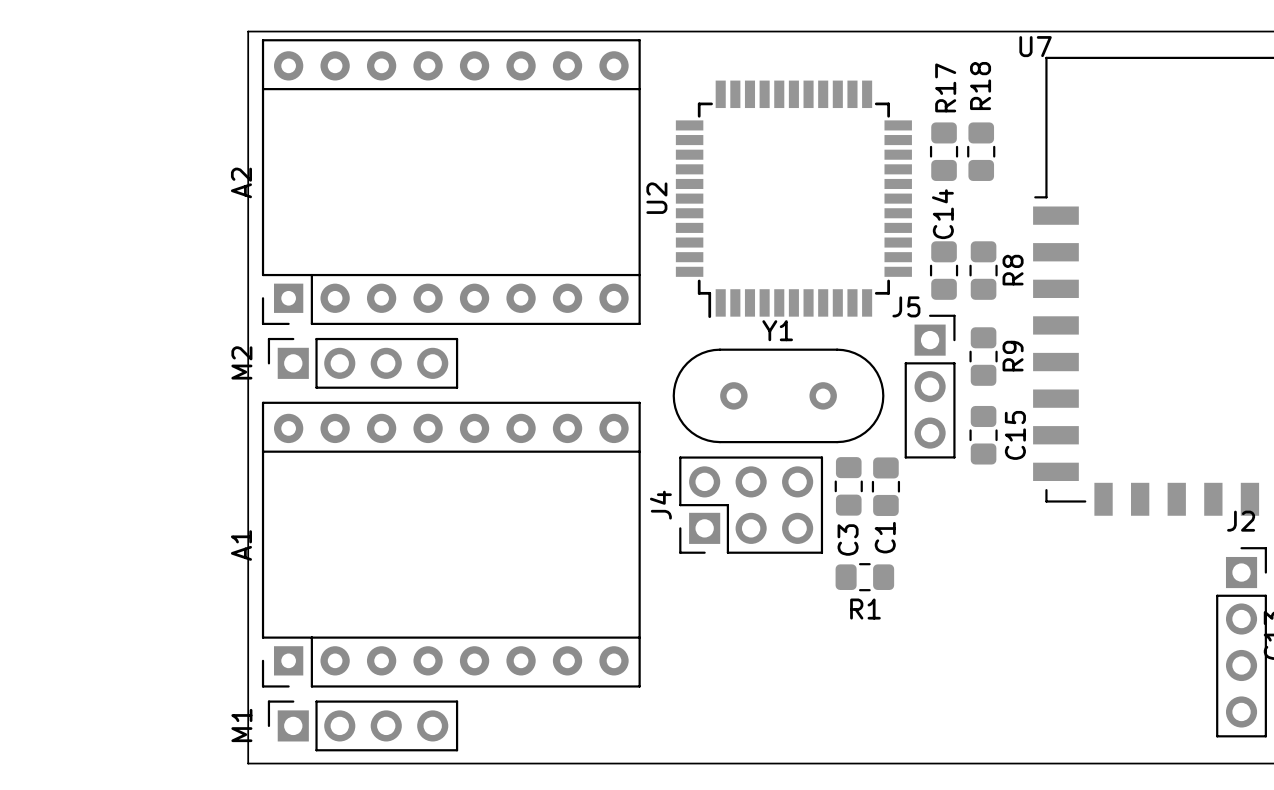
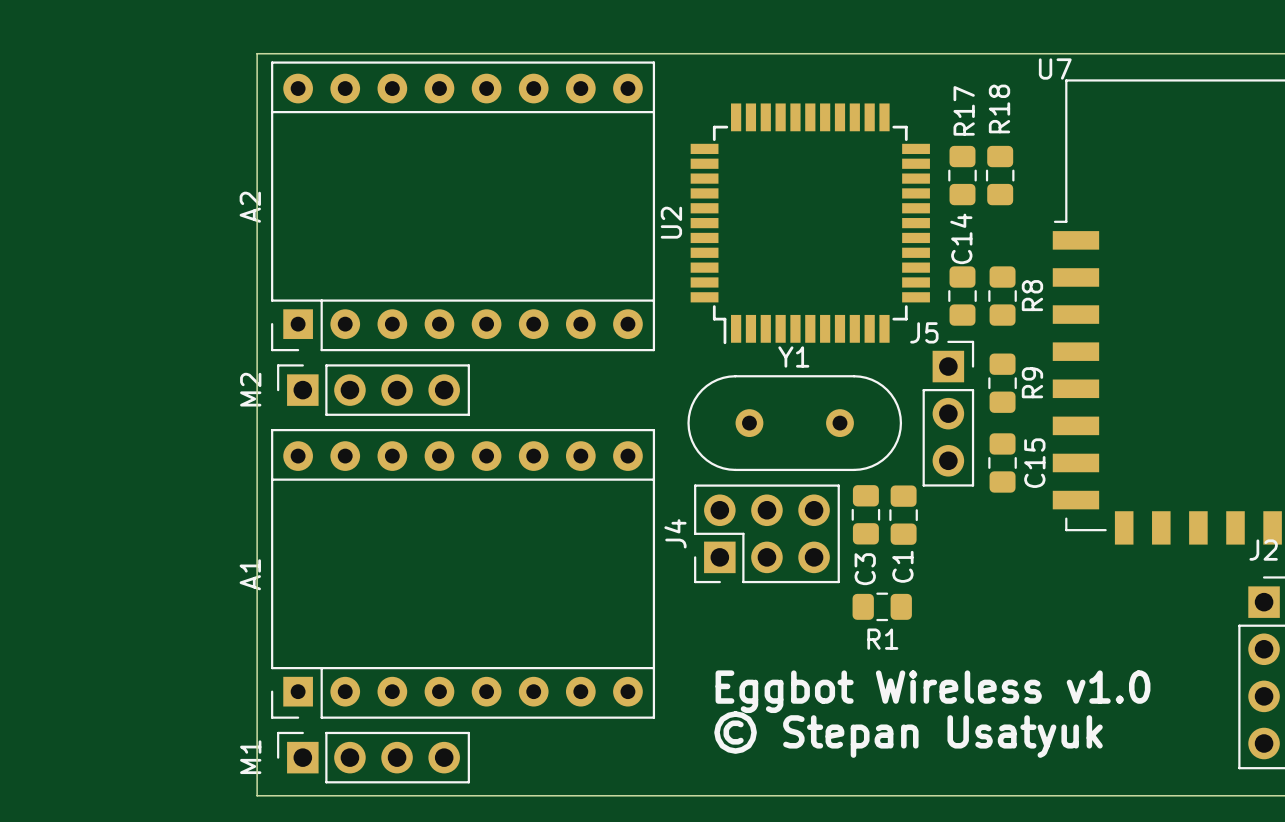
text: none -> Eggbot Wireless v1.0 (933, 691)
text: none -> © Stepan Usatyuk (908, 734)

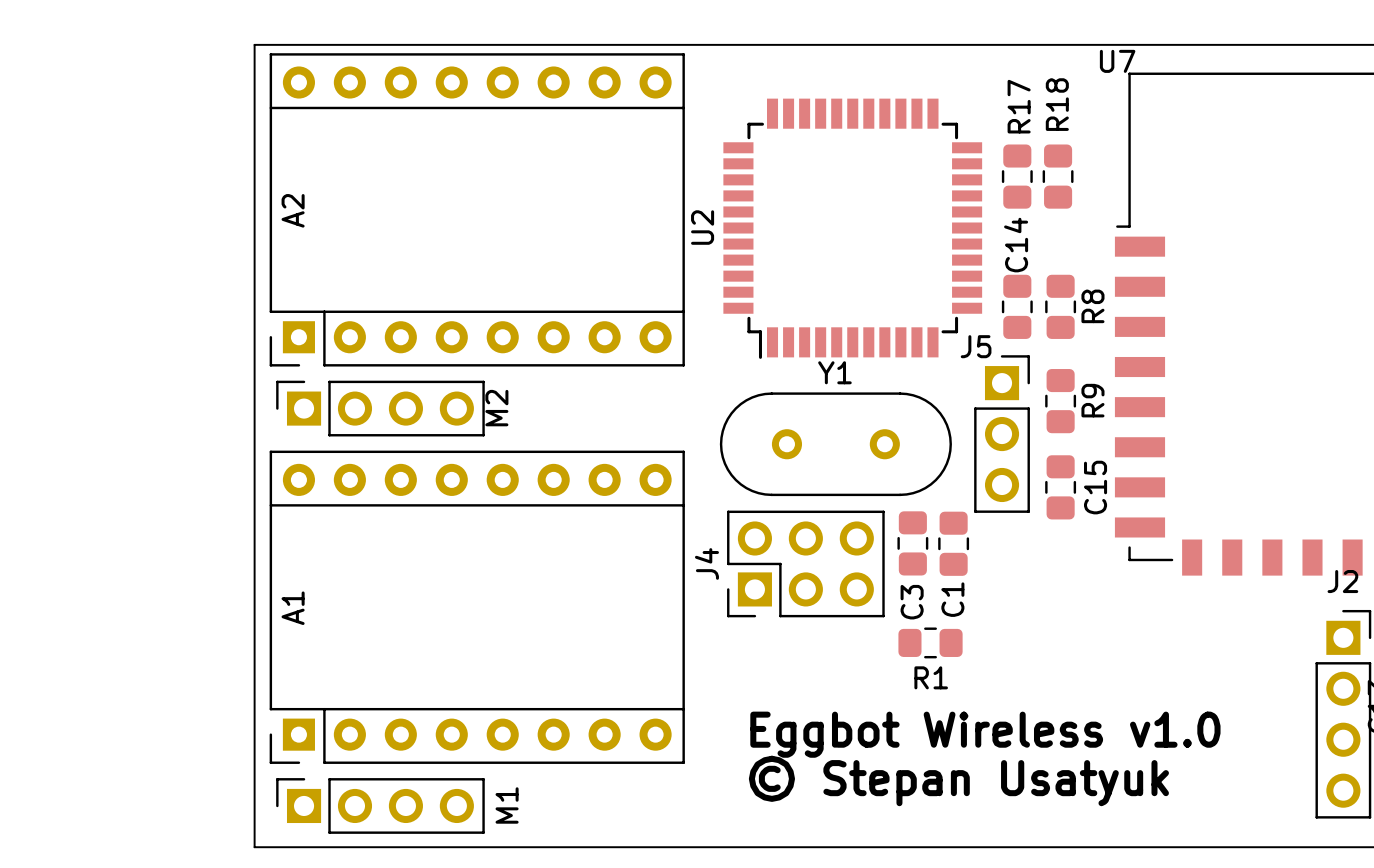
A2 name position: A2 (250, 207) -> A2 (293, 210)
M2 name position: M2 (250, 389) -> M2 (496, 408)
A1 name position: A1 (250, 574) -> A1 (293, 608)
M1 name position: M1 (250, 757) -> M1 (507, 805)

